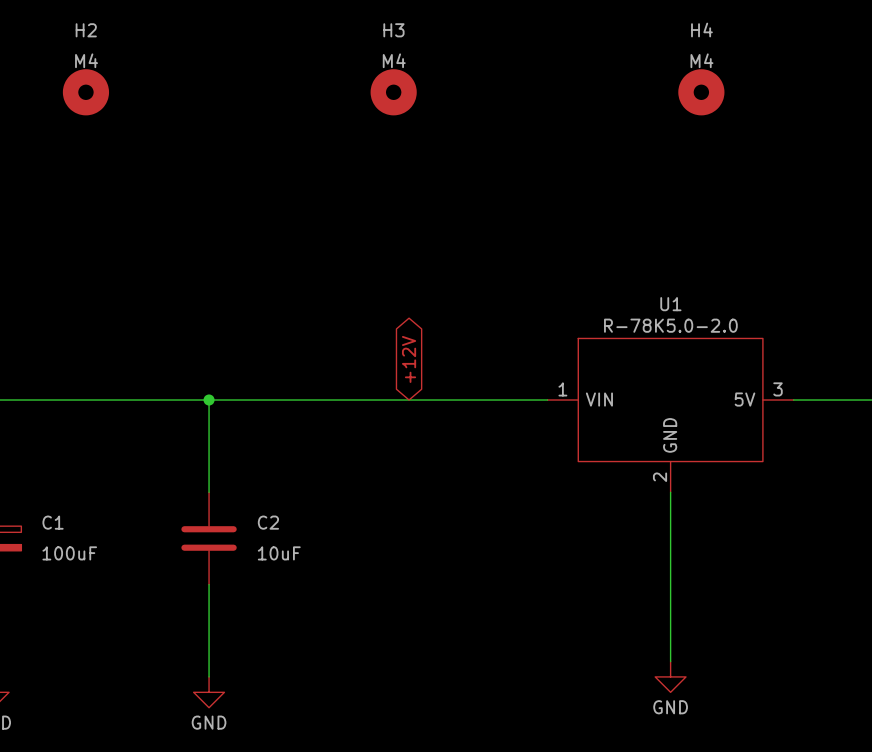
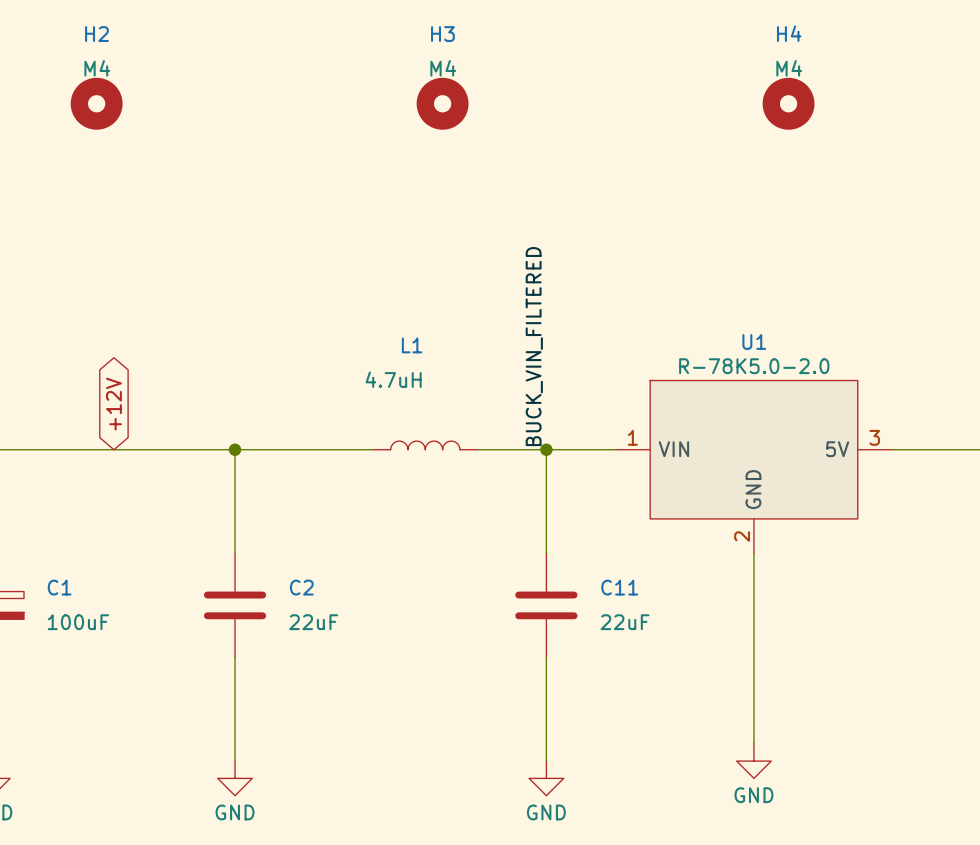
label: none -> BUCK_VIN_FILTERED (534, 346)
global label: none -> +12V (113, 404)
global label: +12V (409, 359) -> none
L1: none -> 4.7uH (425, 445)
wire: (332, 400) (424, 400) -> none
wire: none -> (546, 449) (546, 553)
junction: none -> (546, 449)
C11: none -> 22uF (546, 605)
C2 value: 10uF (279, 553) -> 22uF (313, 622)
wire: none -> (546, 657) (546, 761)
power symbol: none -> GND (546, 778)

